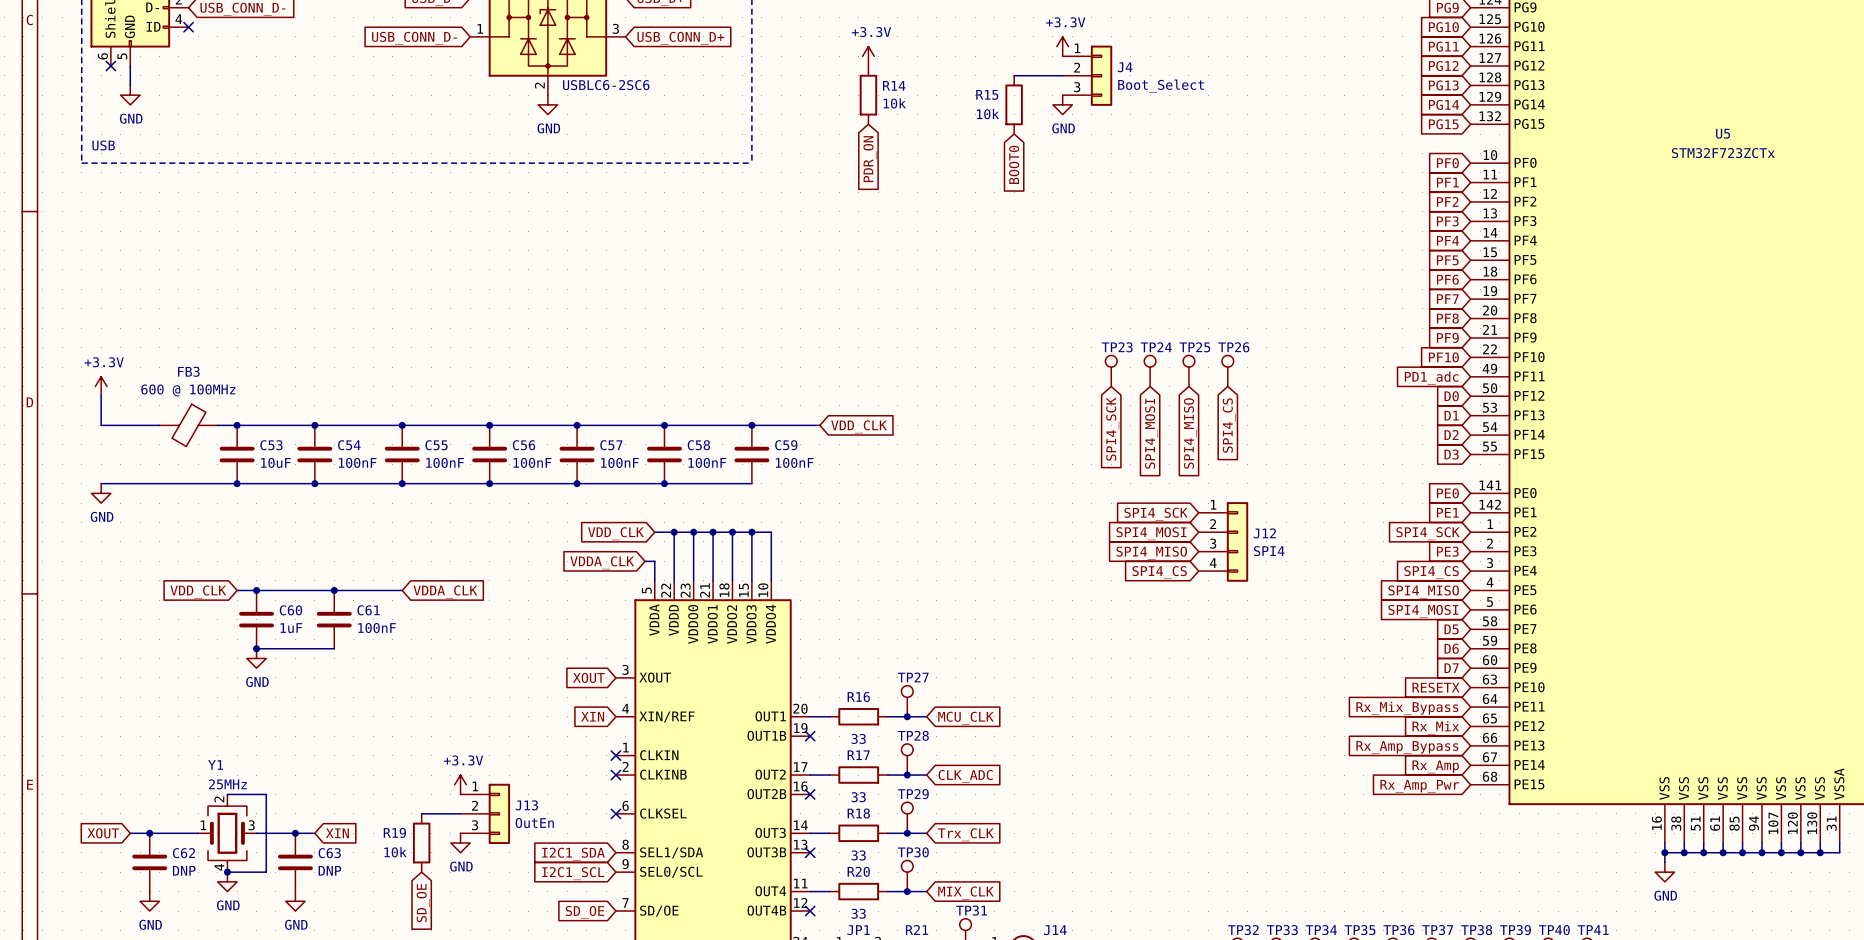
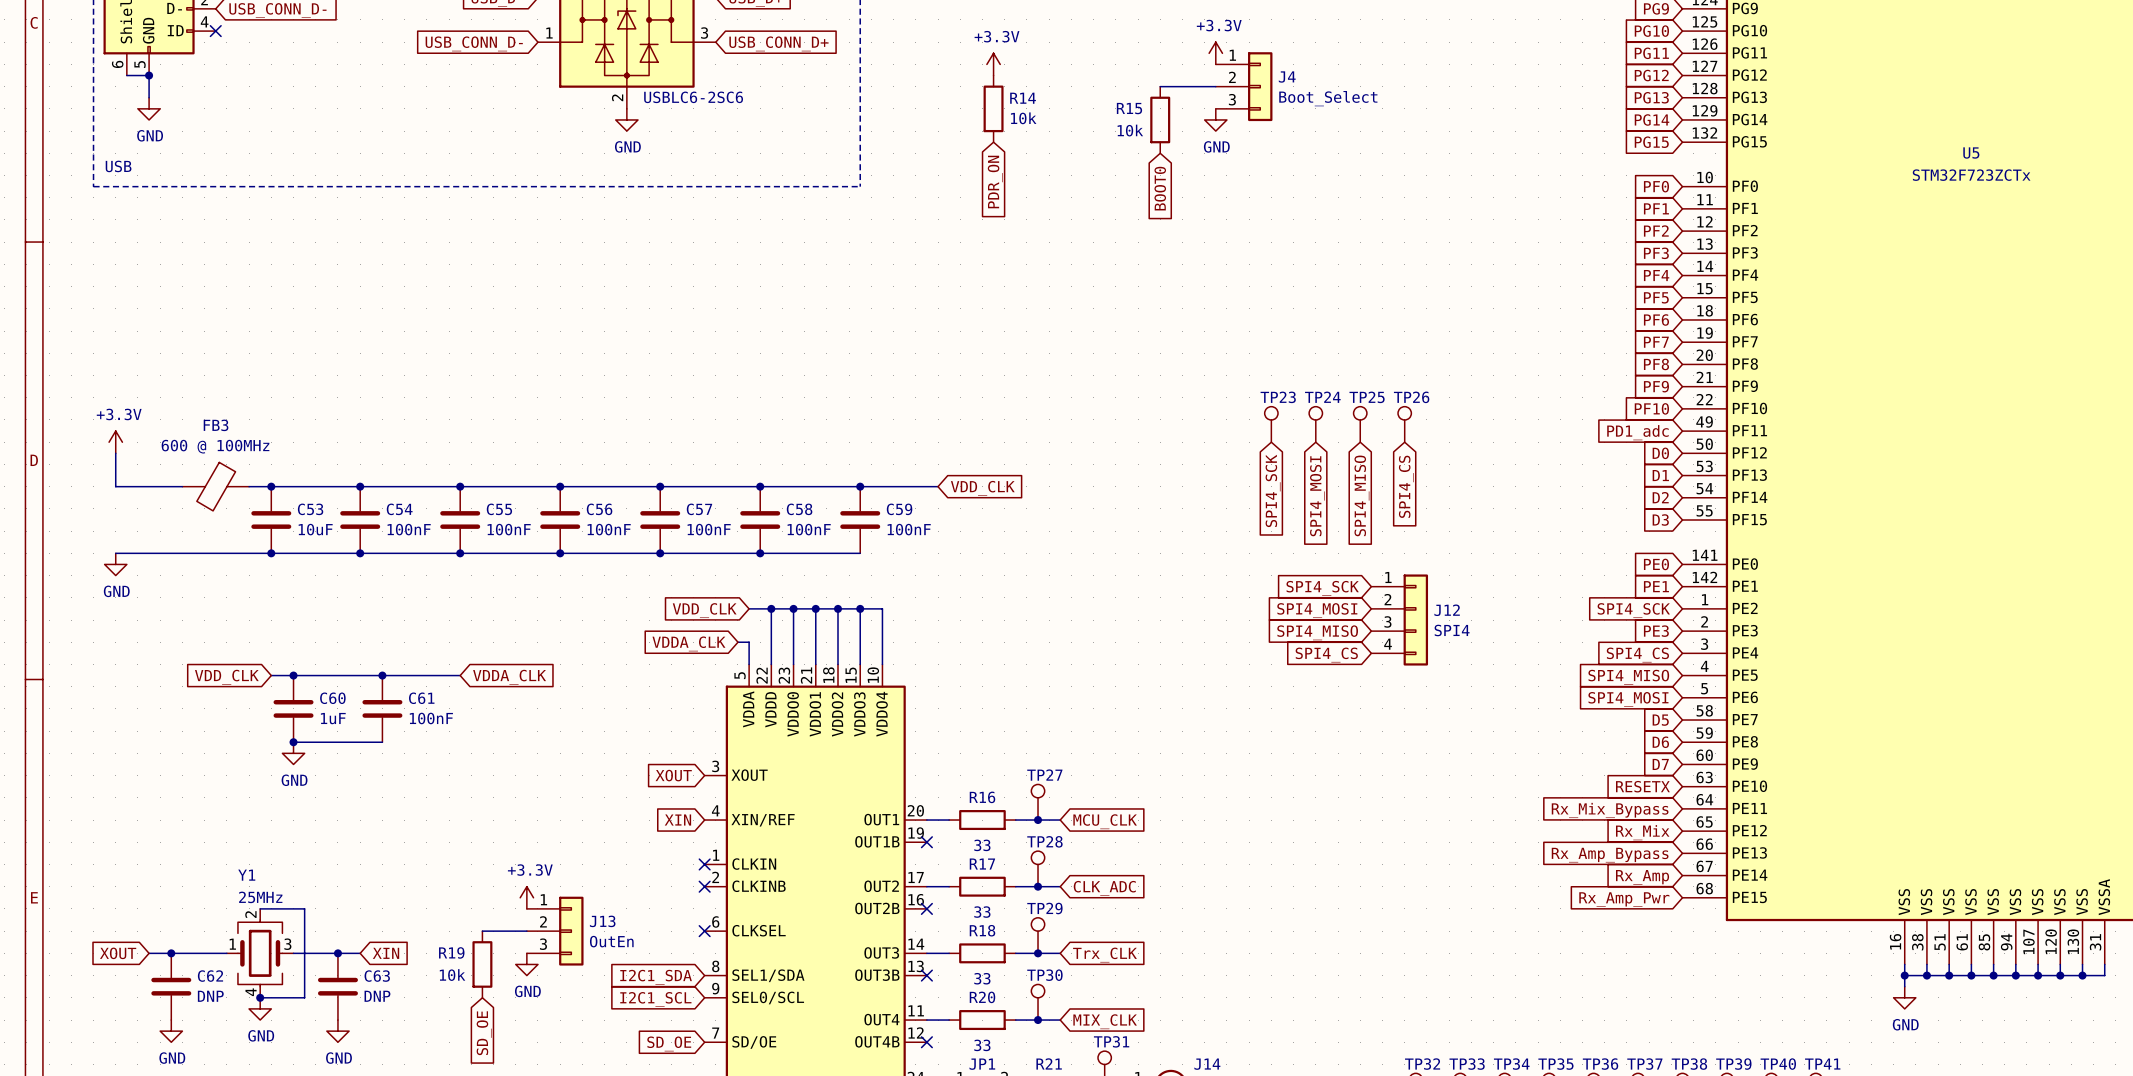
wire: none -> (126, 75) (149, 75)
no-connect mark: (110, 66) -> none
junction: none -> (149, 75)

